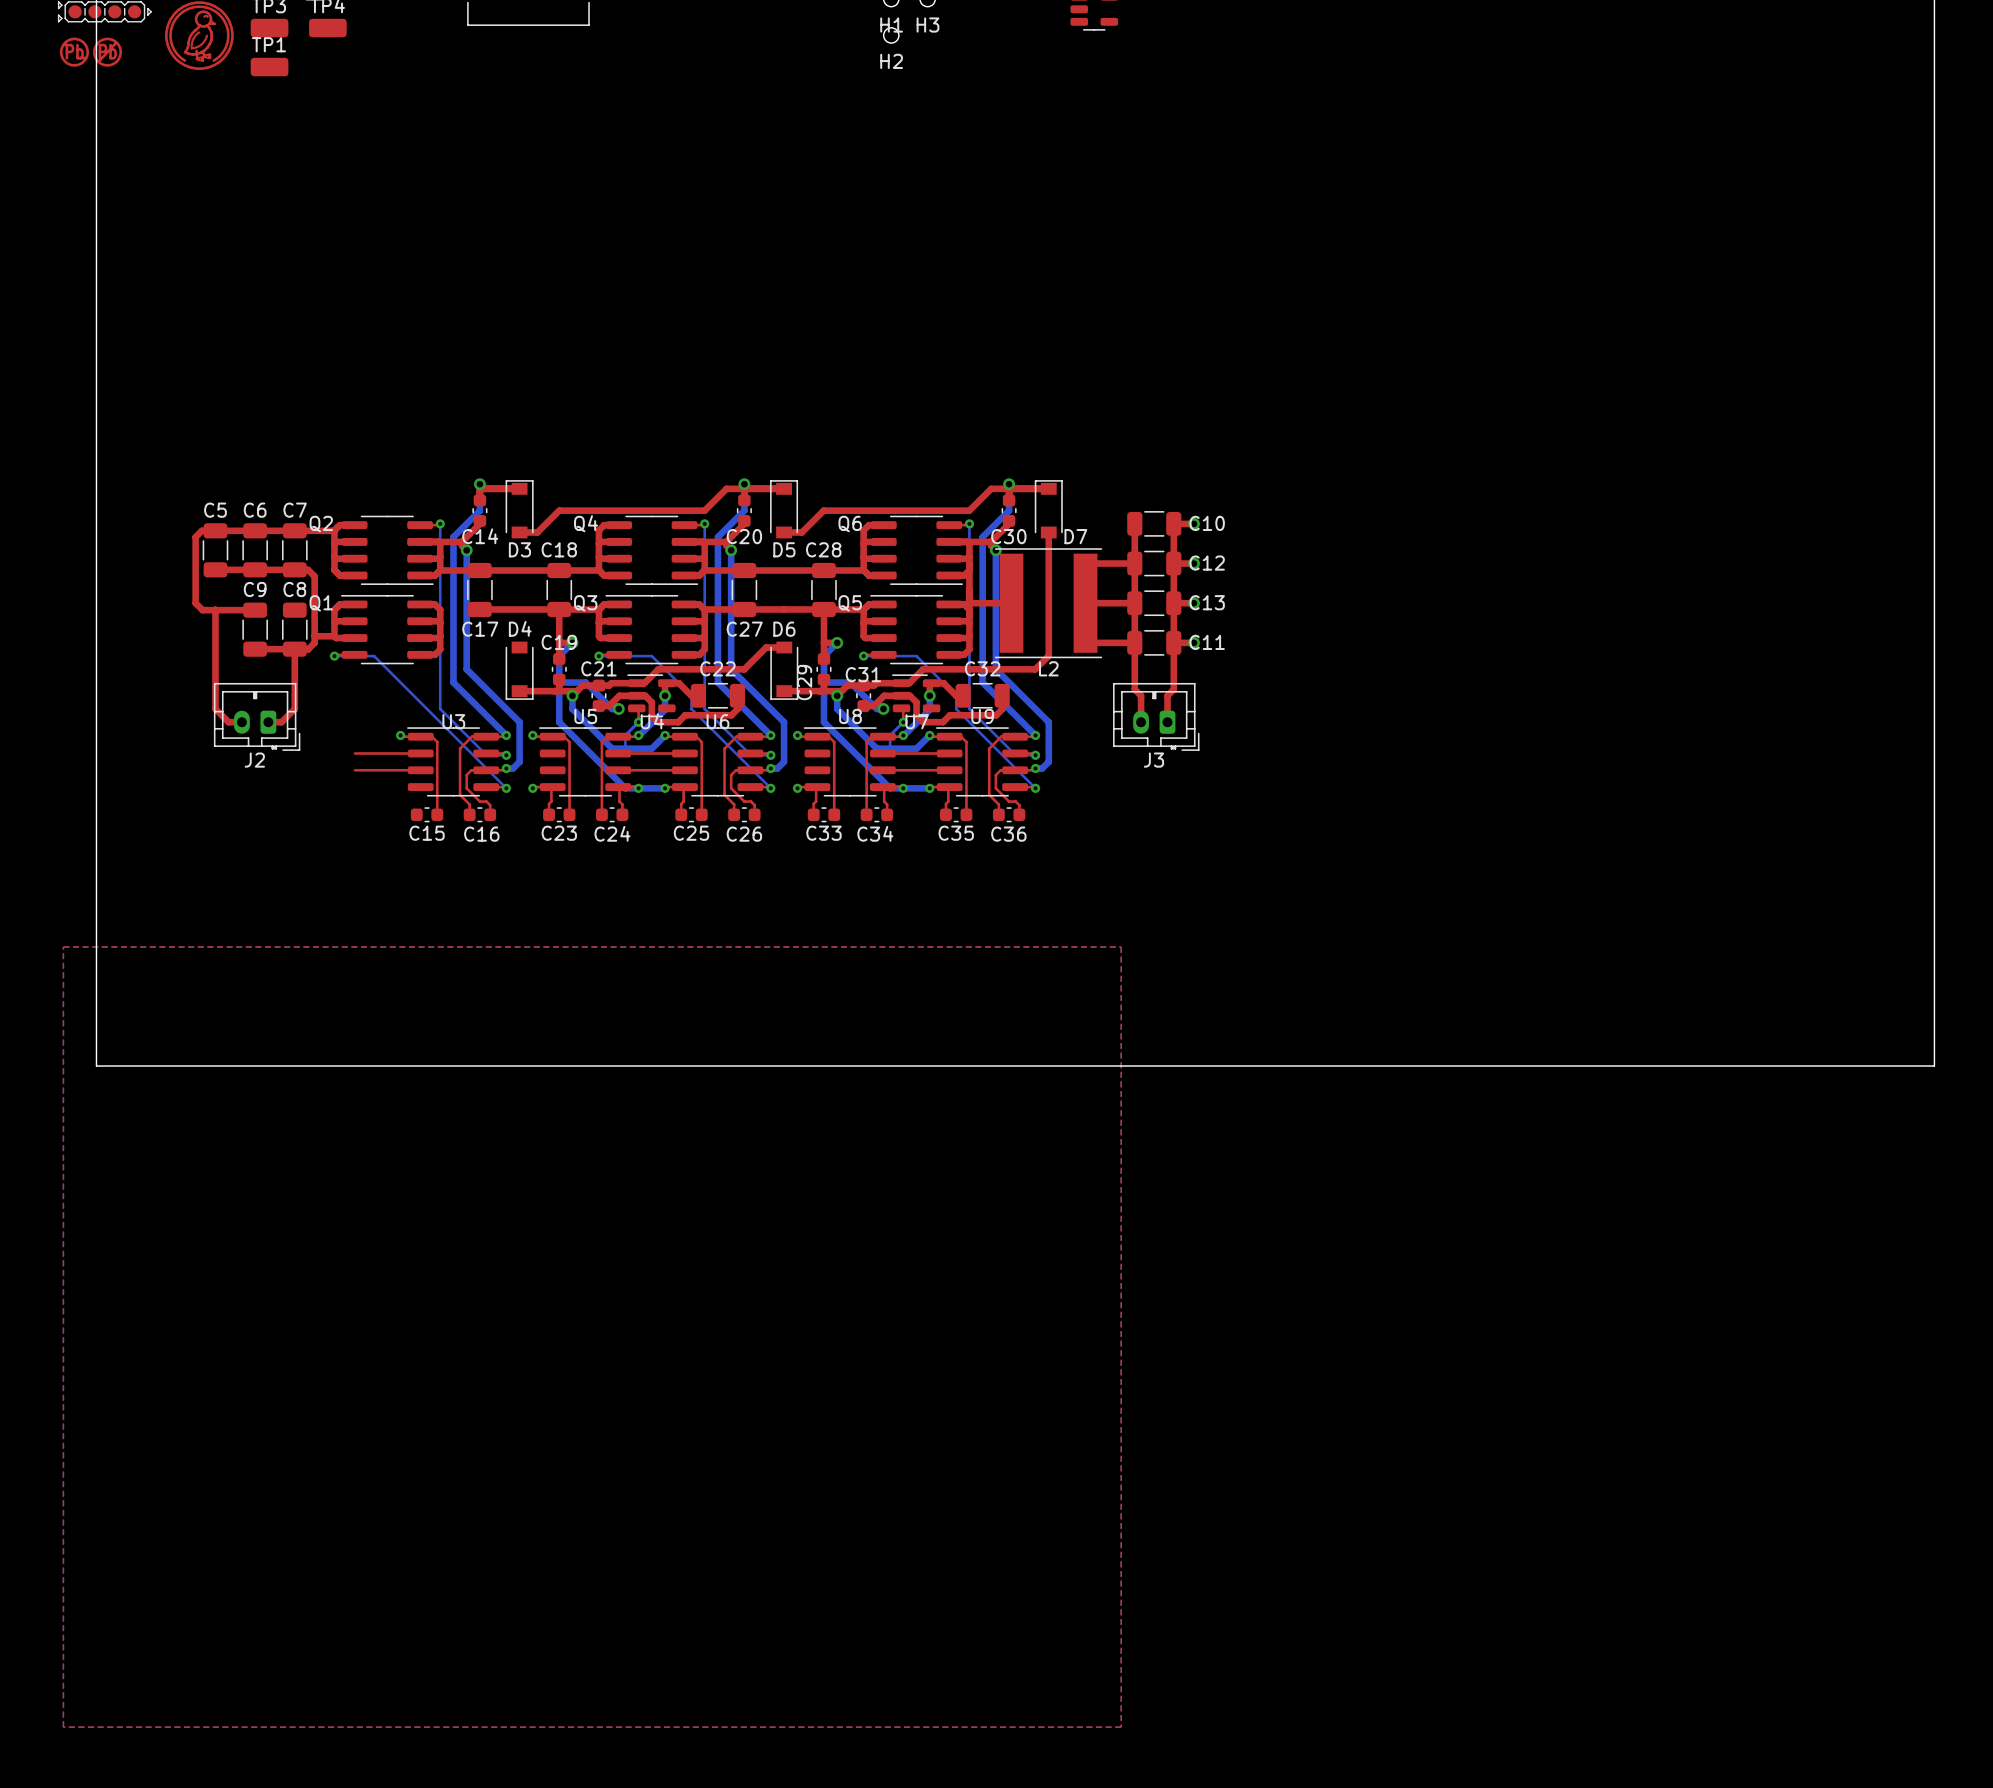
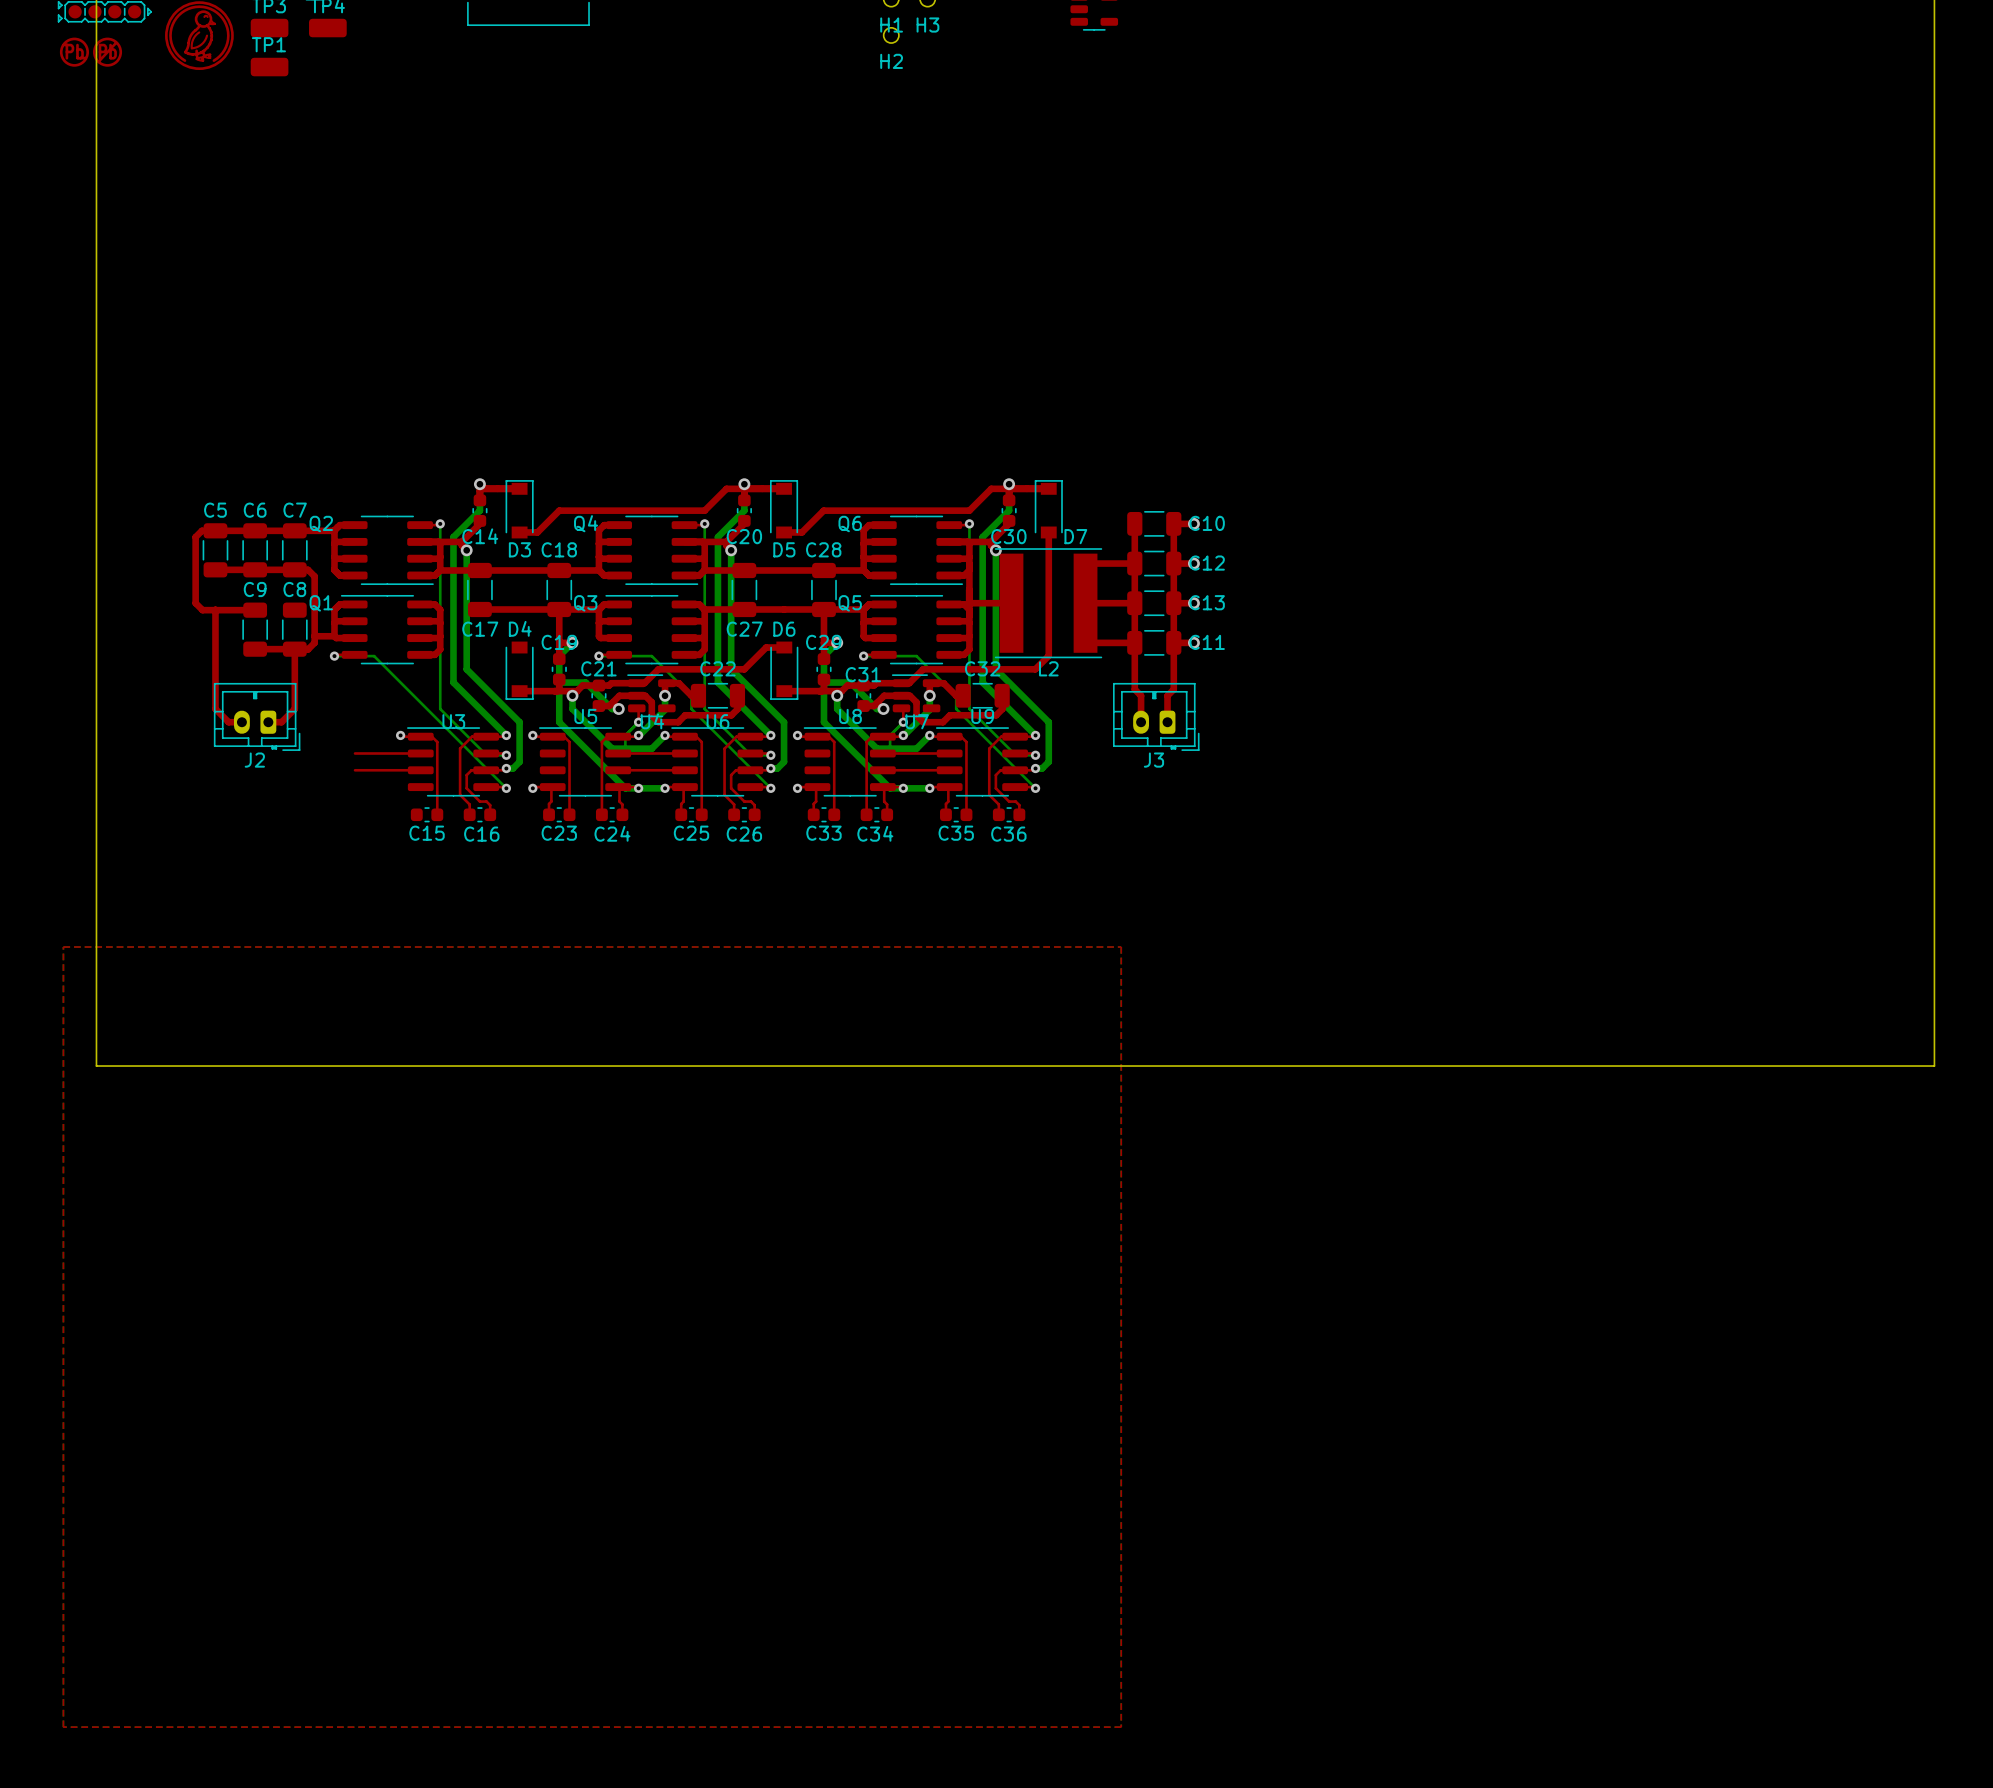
C29 name rotation: 0° (804, 682) -> 90° clockwise (823, 642)

